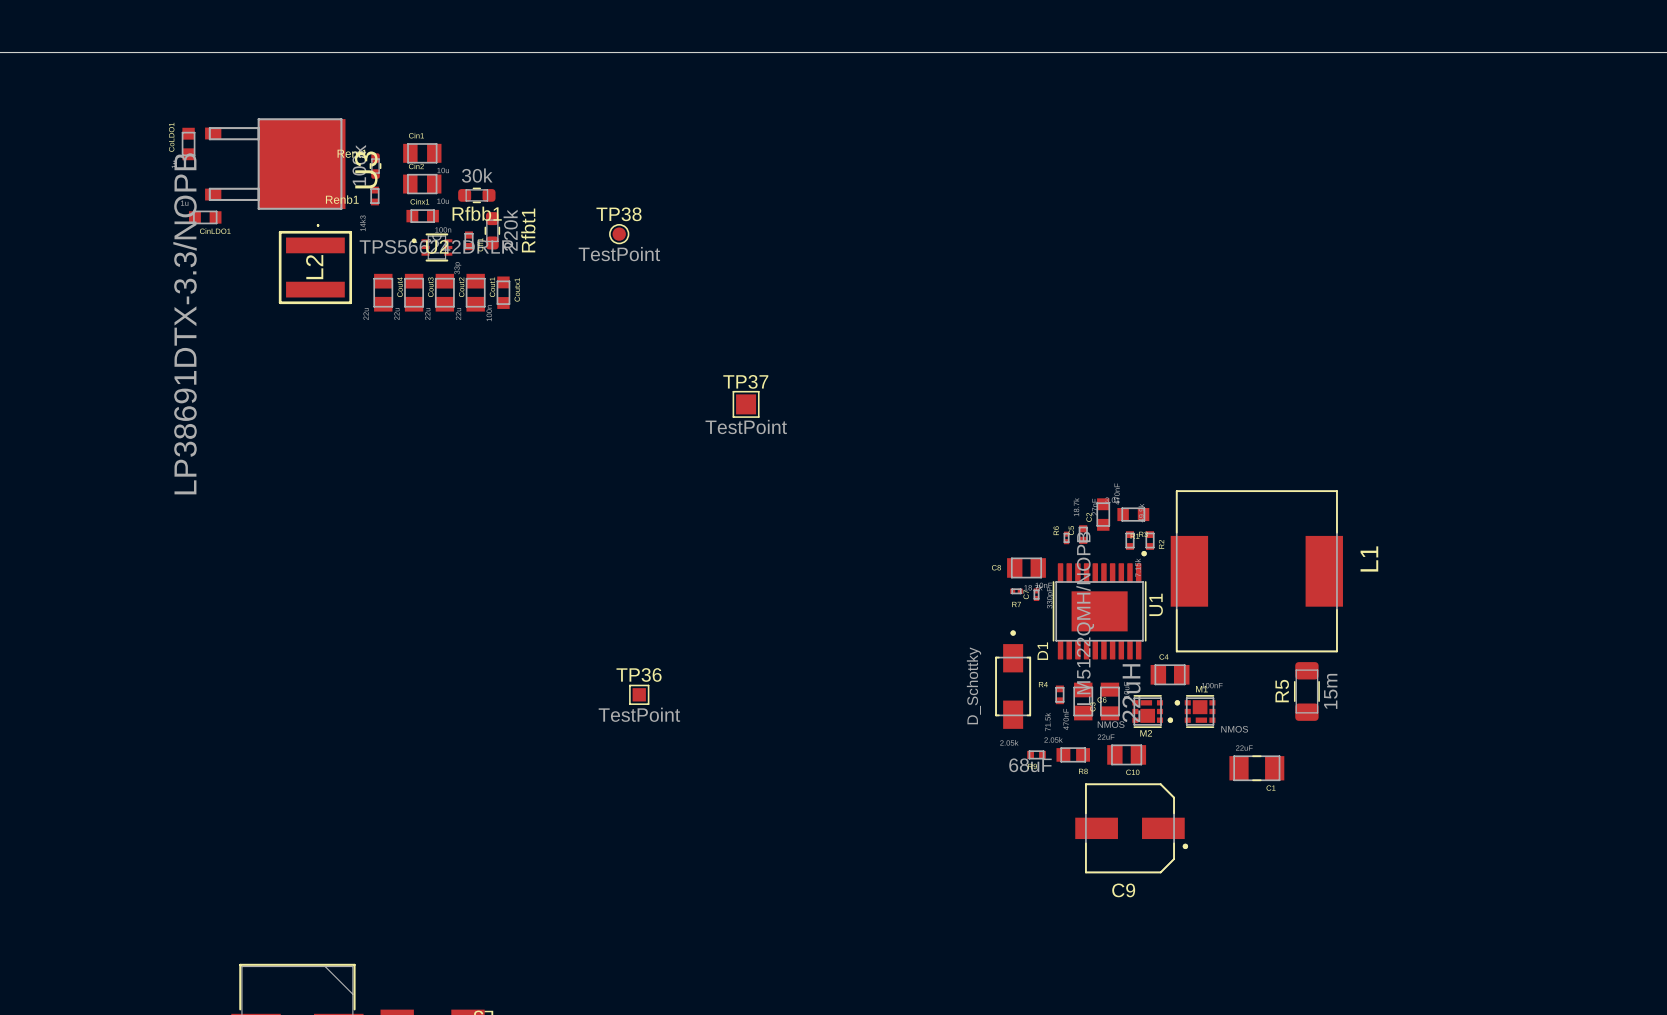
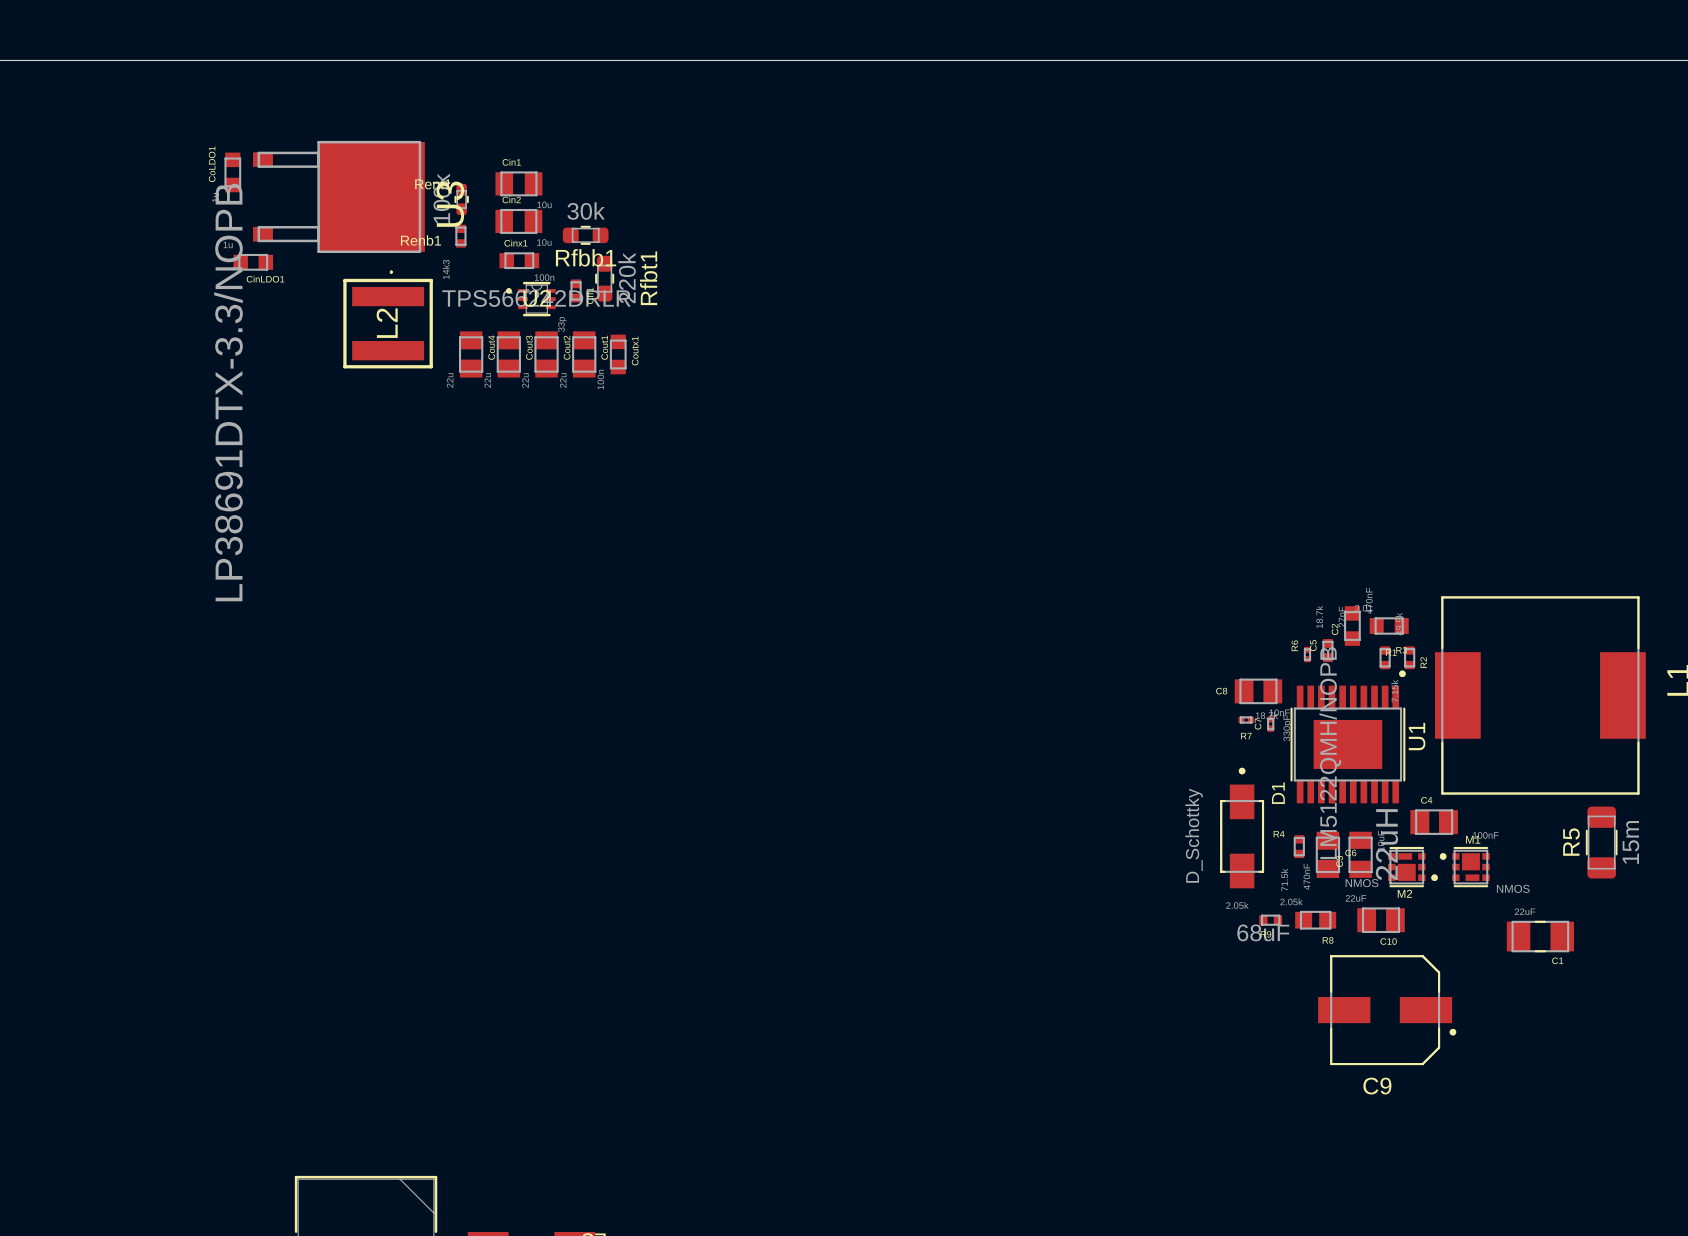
TP38: TestPoint (619, 234) -> none
TP37: TestPoint (746, 404) -> none
TP36: TestPoint (639, 694) -> none

